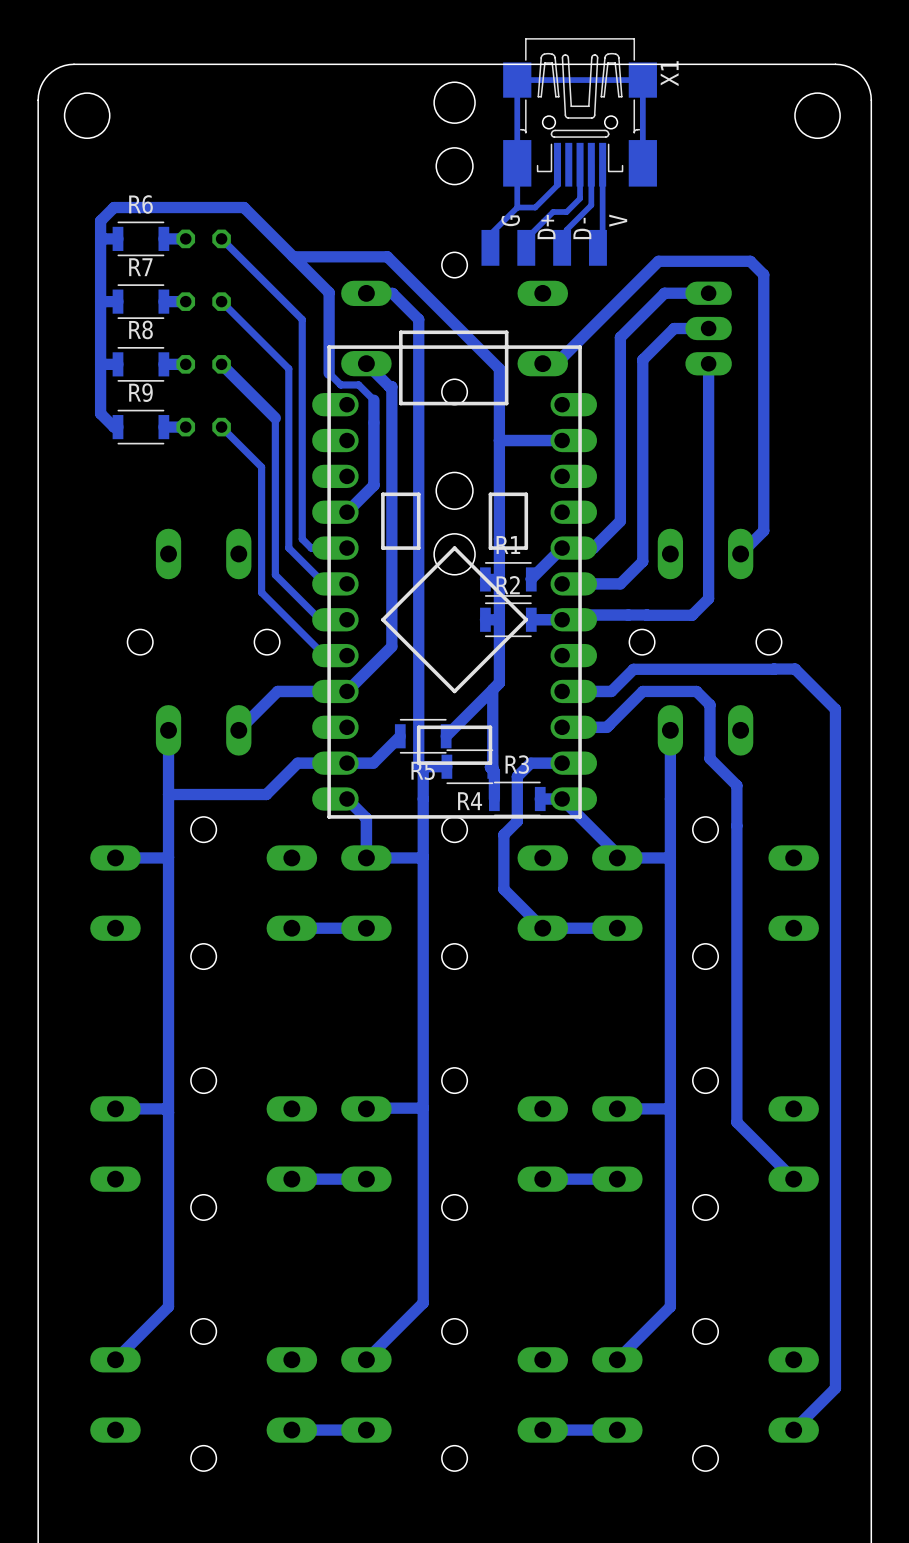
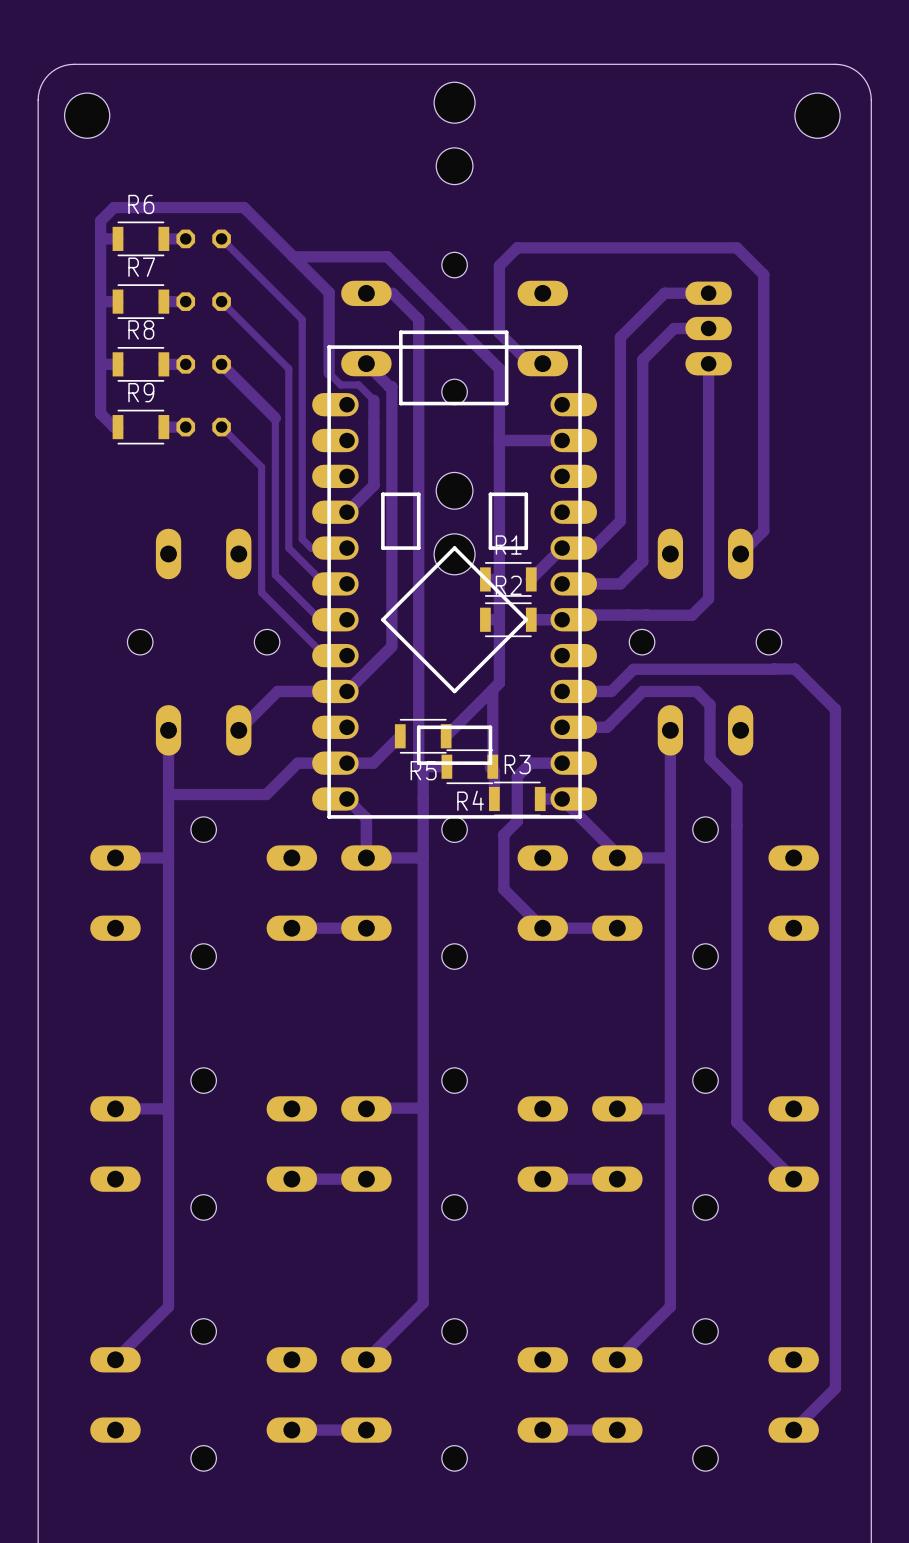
X1: (580, 112) -> none
track: (642, 163) (642, 80) (517, 80) (517, 207) -> none
track: (557, 164) (557, 185) (535, 207) (517, 207) (490, 234) (490, 247) -> none
track: (580, 164) (580, 198) (566, 212) (553, 212) (526, 238) (526, 247) -> none
track: (591, 164) (591, 205) (566, 229) (566, 243) (562, 247) -> none
track: (602, 164) (602, 243) (597, 247) -> none
G: (490, 247) -> none
D+: (526, 247) -> none
D-: (562, 247) -> none
V: (597, 247) -> none
track: (750, 261) (658, 261) (556, 363) (542, 363) -> (750, 261) (736, 247) (517, 247) (499, 265) (499, 332) (530, 363) (542, 363)

